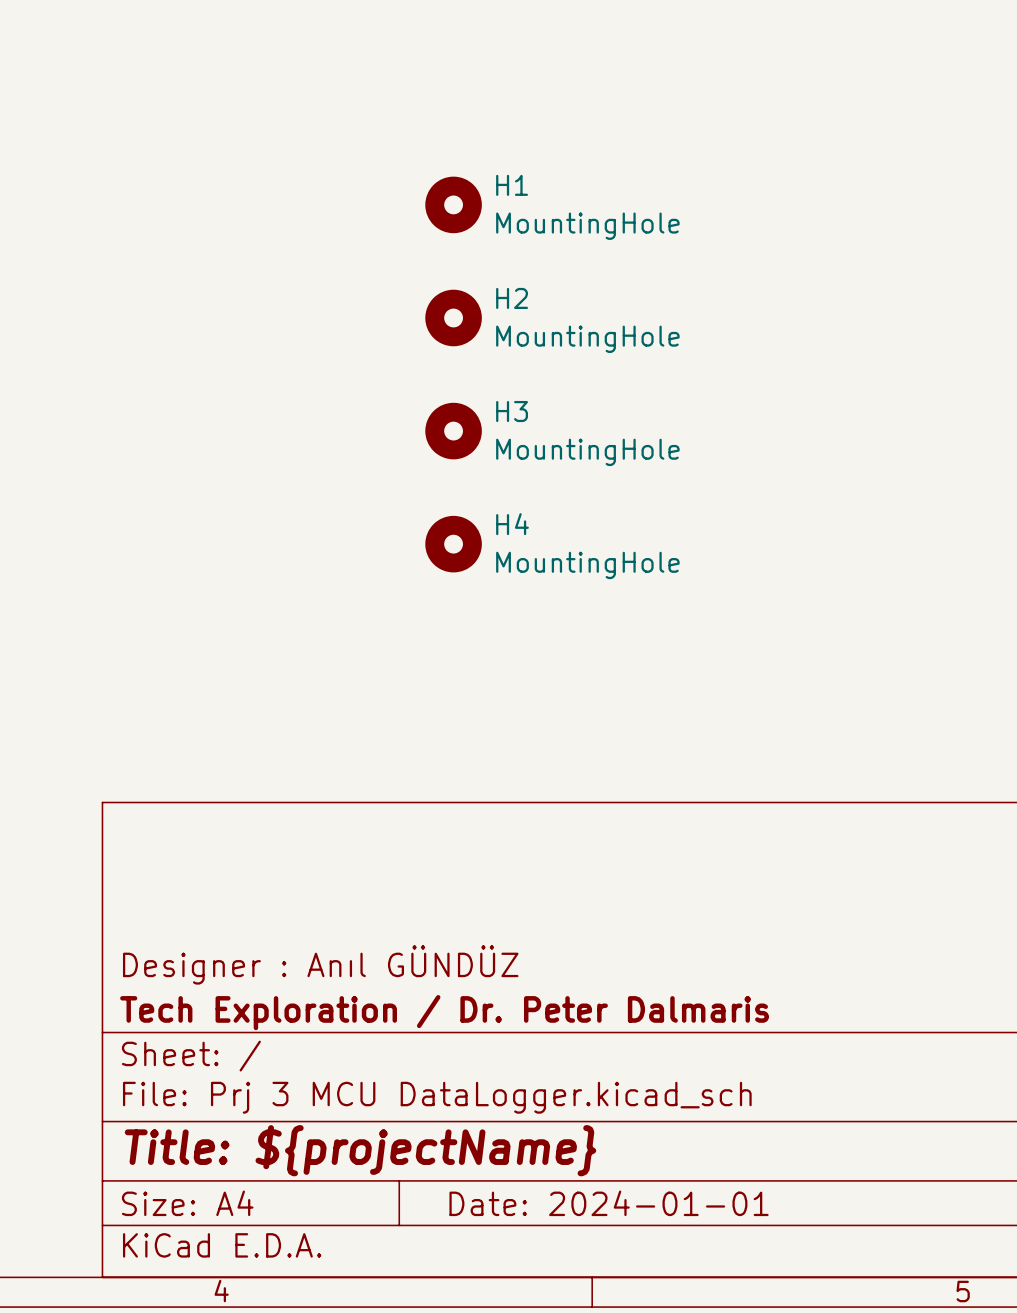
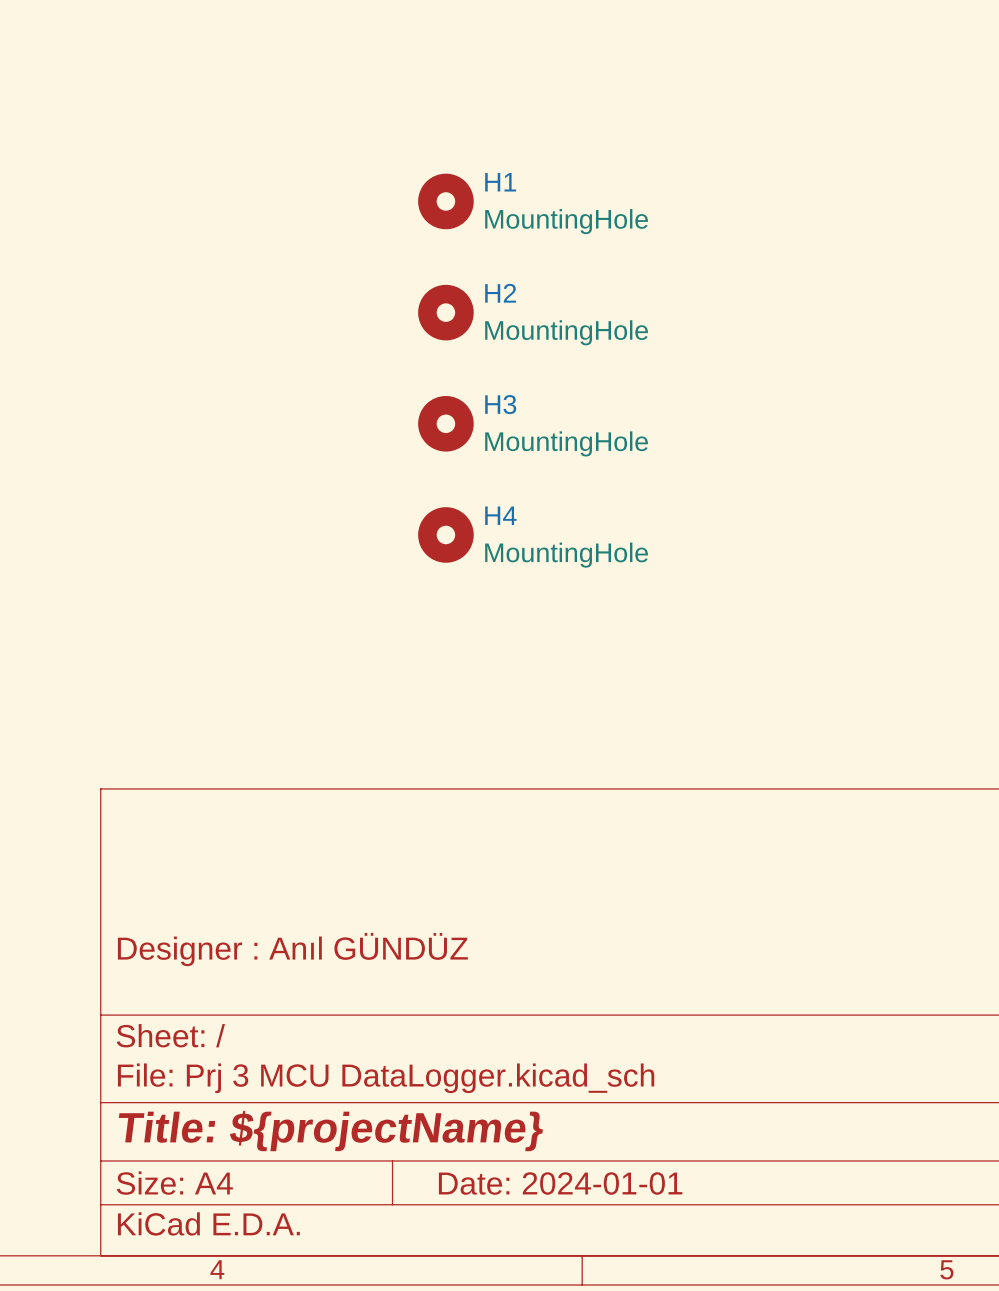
title block: Tech Exploration / Dr. Peter Dalmaris (444, 1012) -> none

